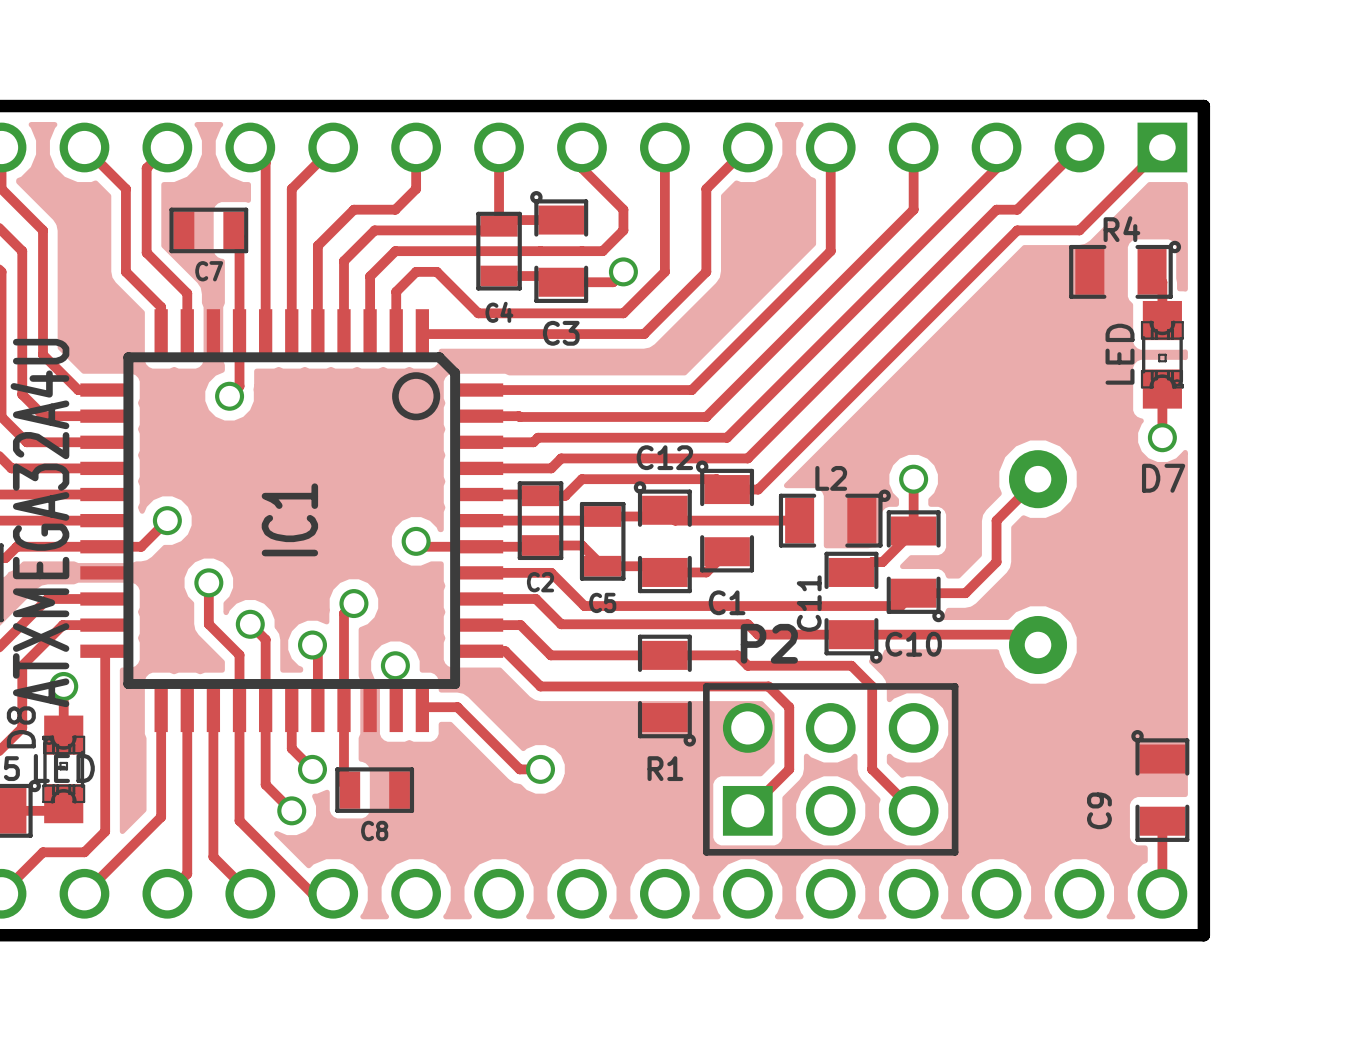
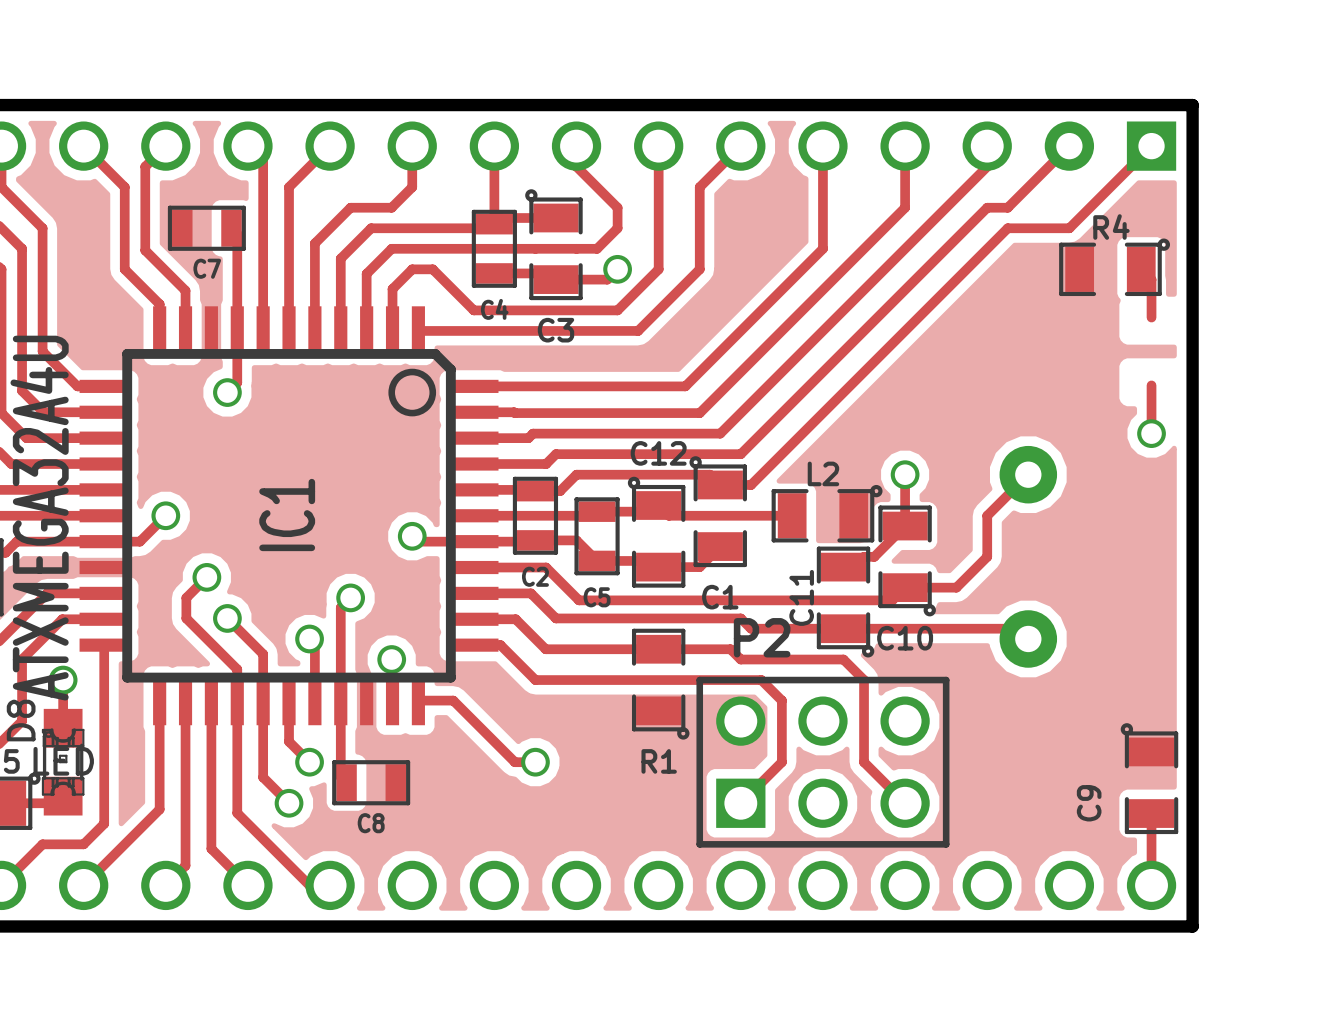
D7: LED (1162, 354) -> none
track: (208, 582) (208, 624) (239, 654) (239, 675) -> (206, 577) (186, 597) (186, 618) (237, 669)
track: (250, 624) (265, 639) (265, 660) -> (227, 618) (263, 654)
via position: (250, 624) -> (227, 618)

